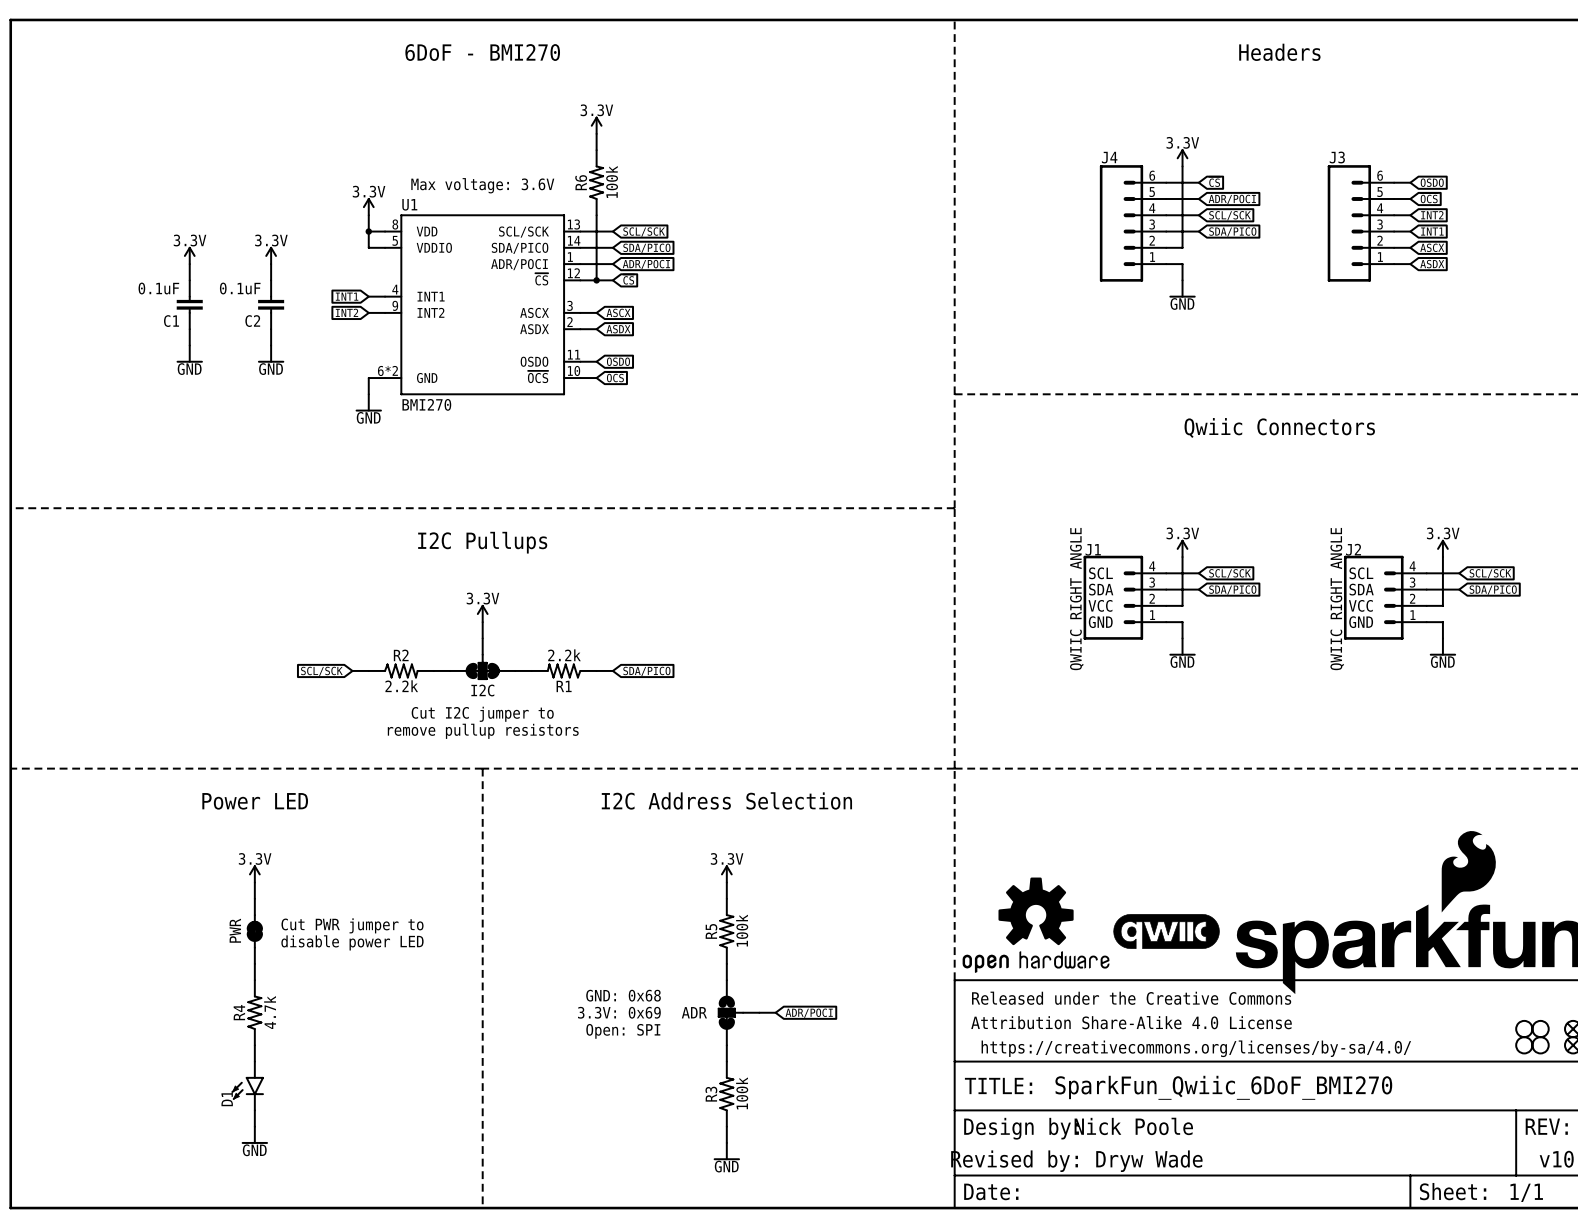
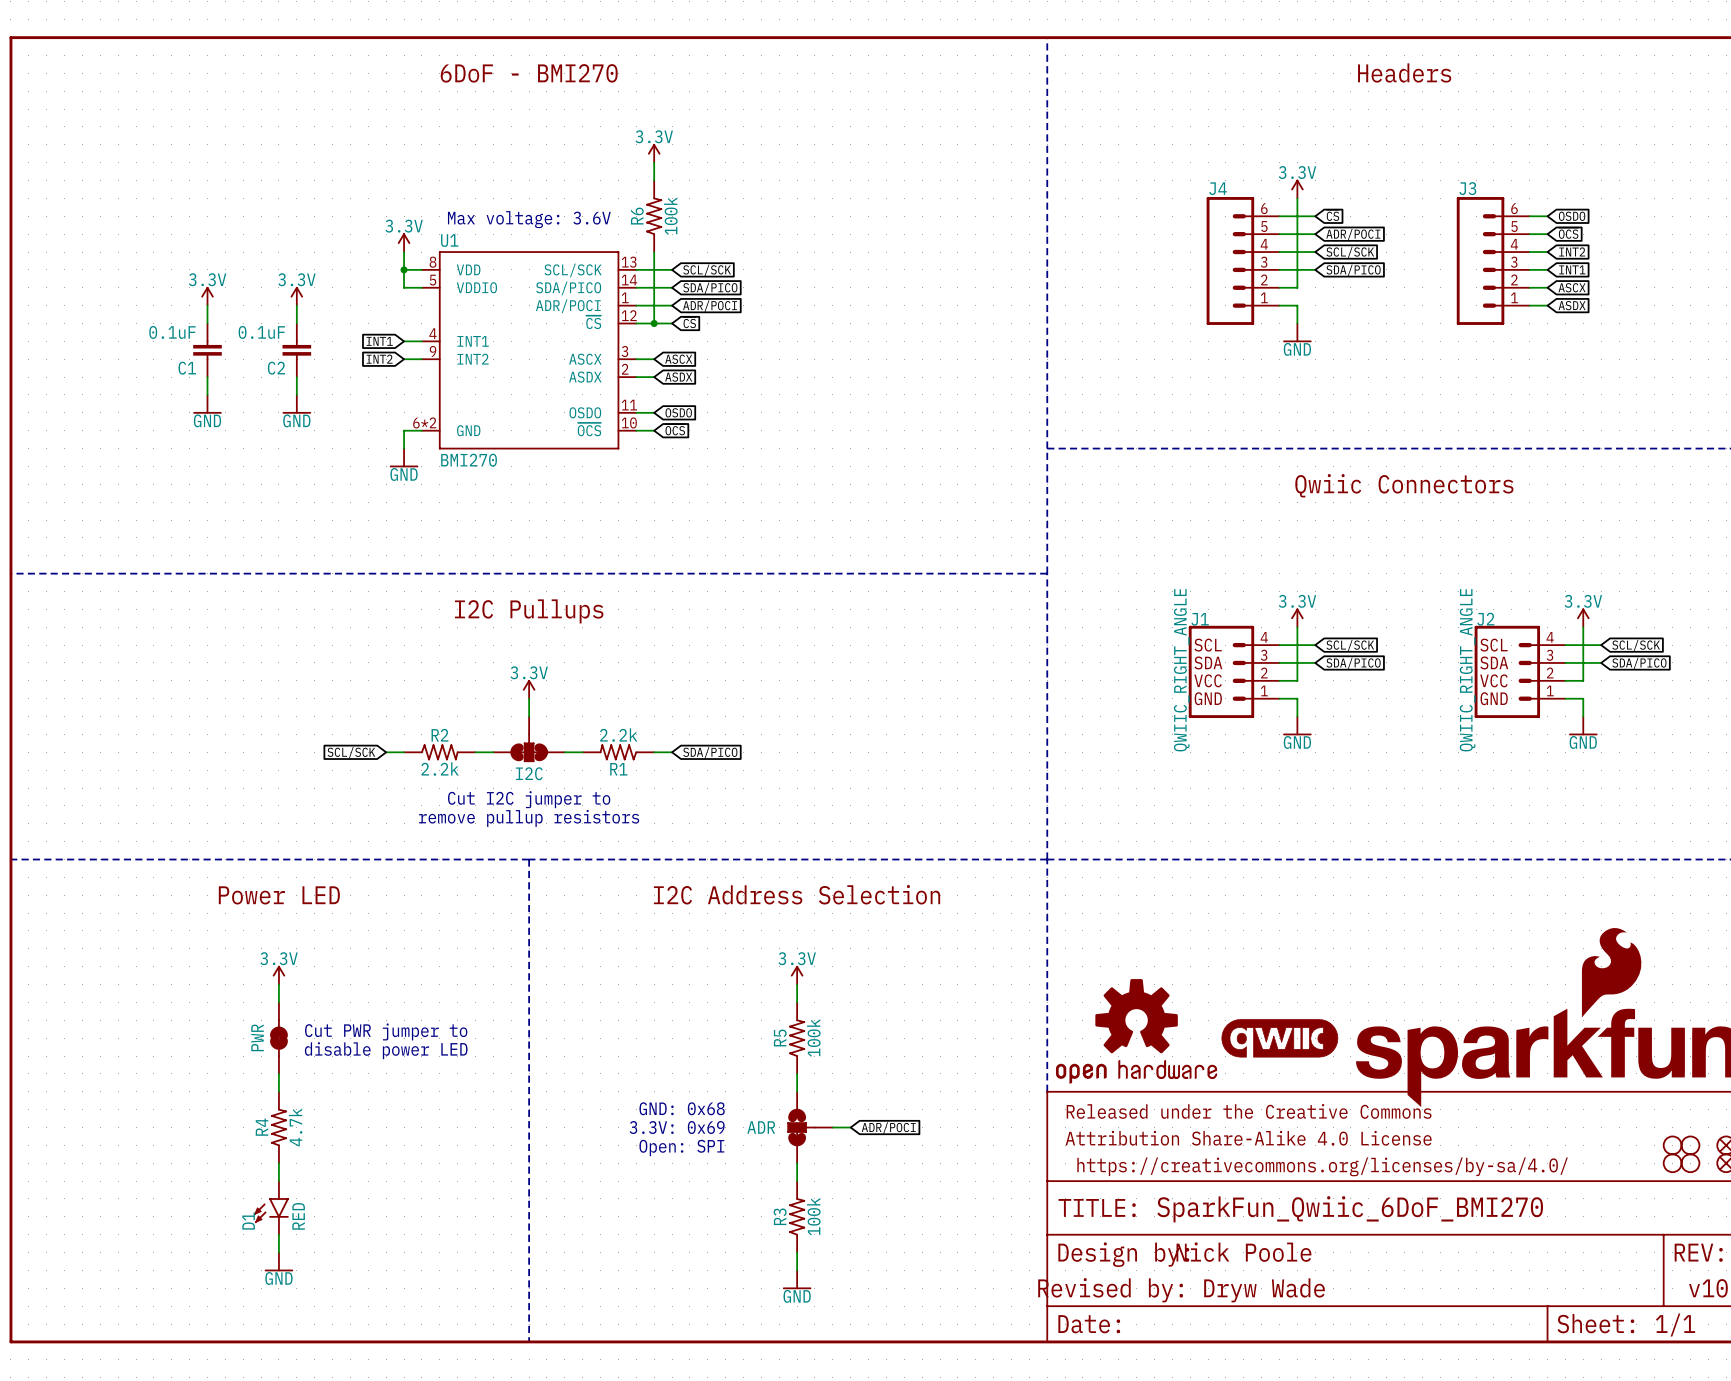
D1 value: none -> RED (298, 1216)

